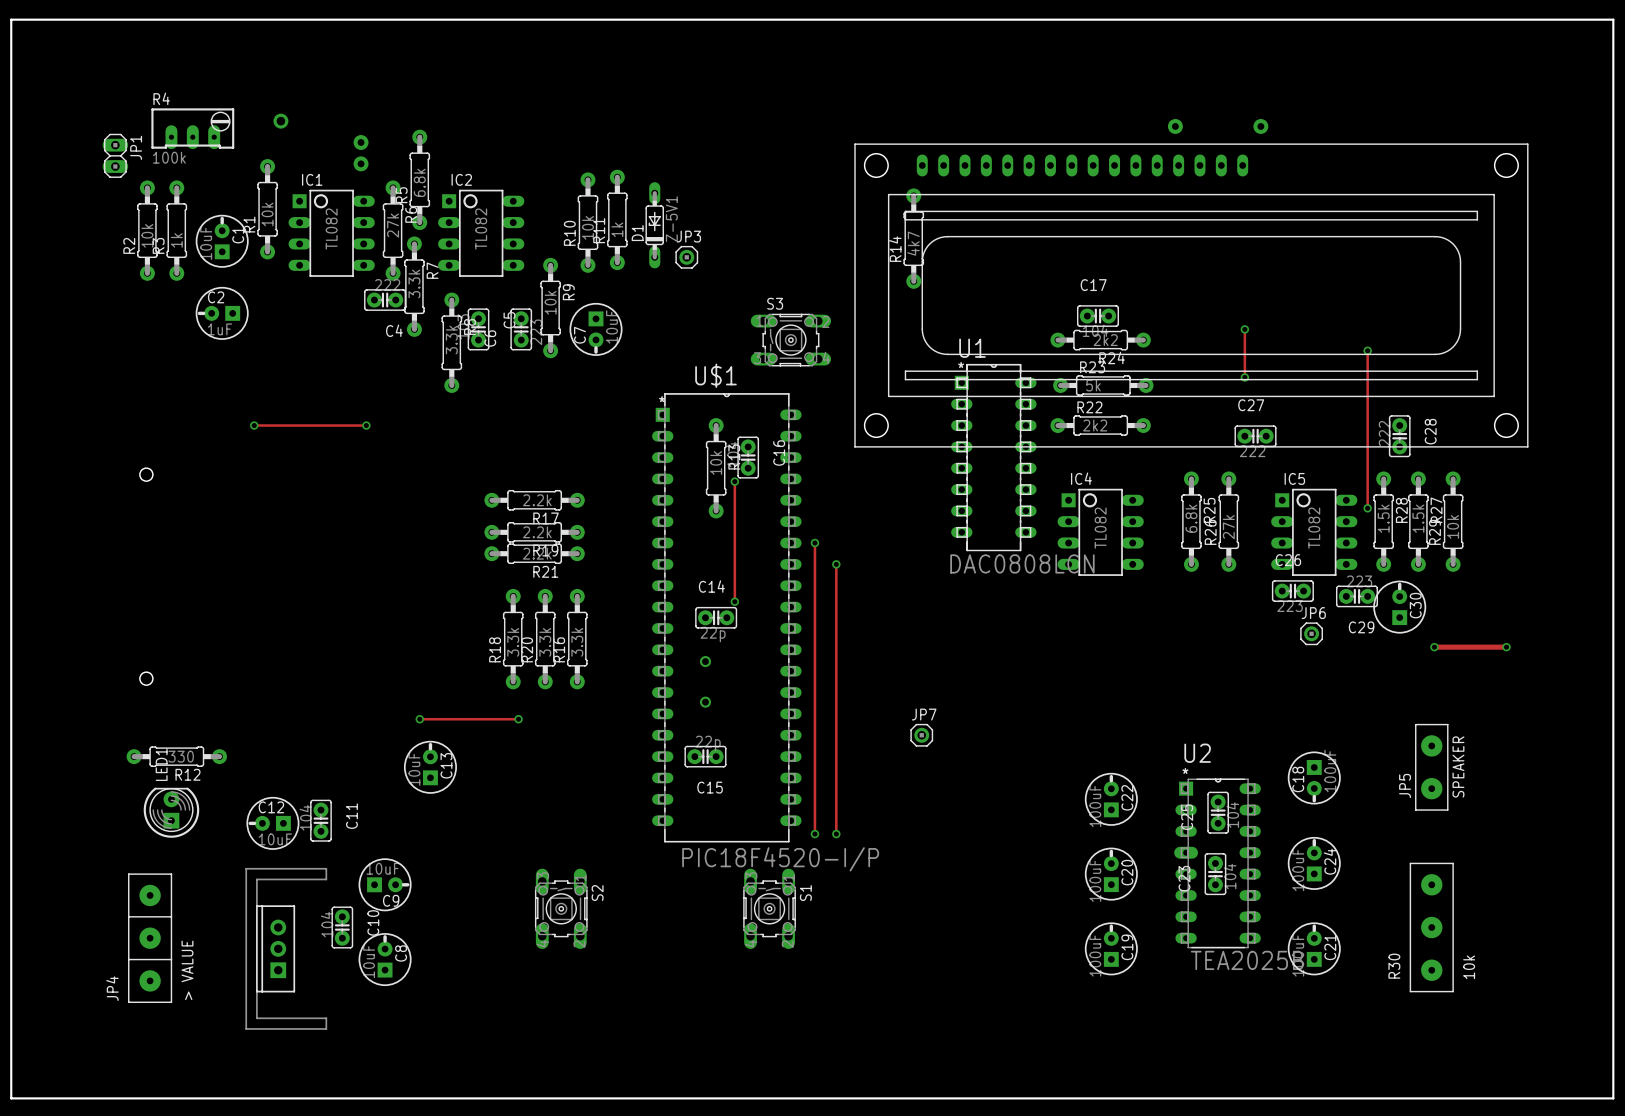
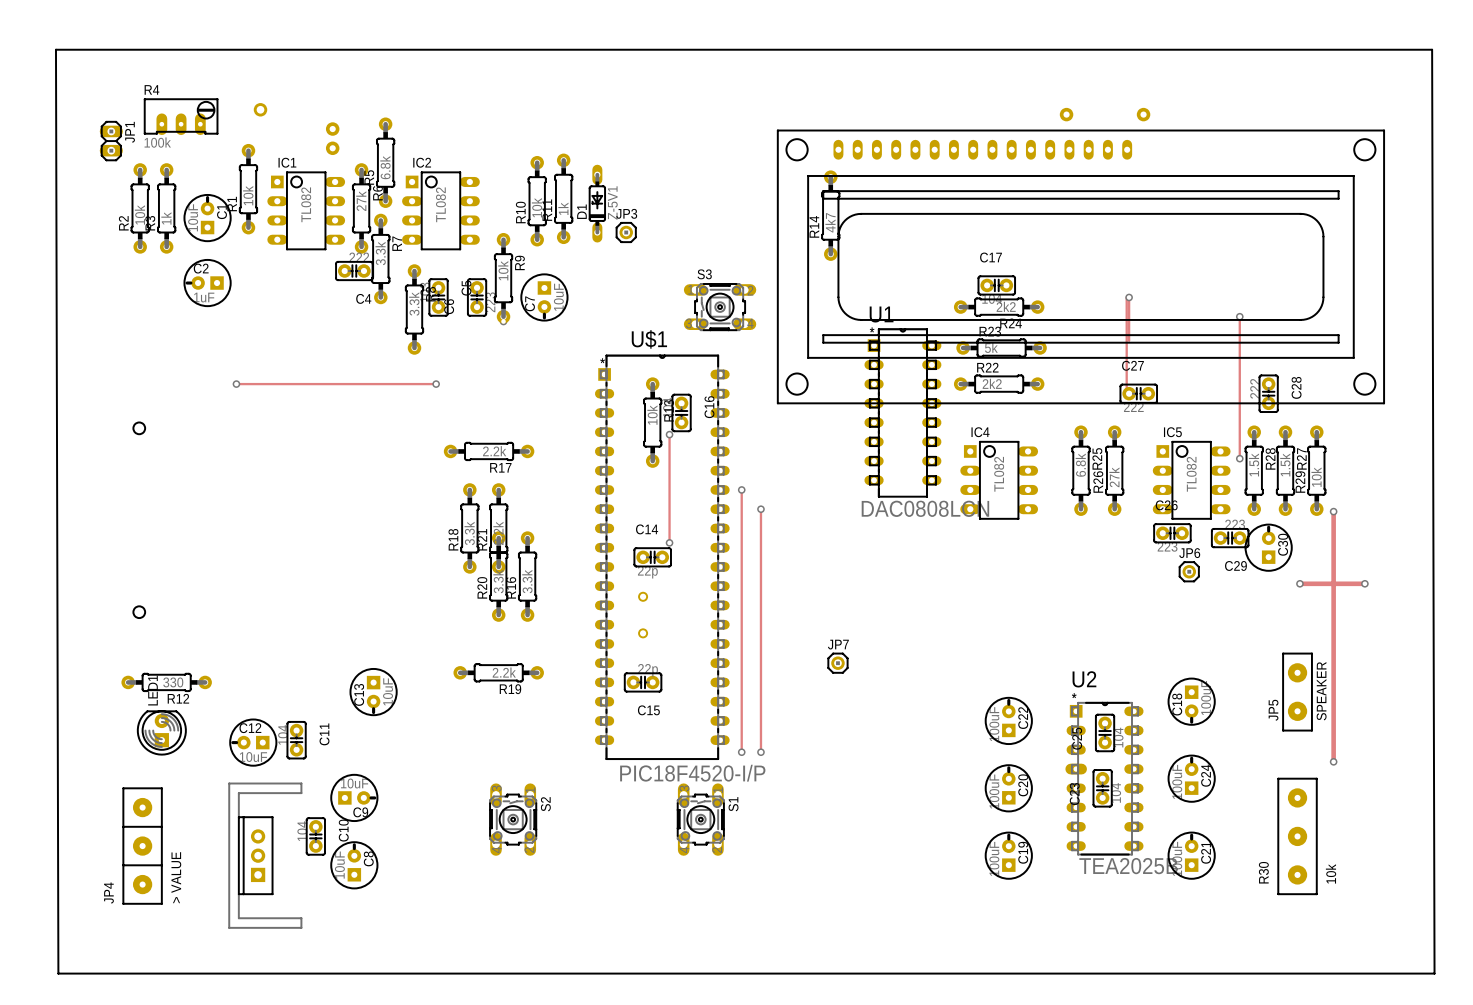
board edge: (11, 19) (1613, 19) (1613, 1098) (11, 1098) (11, 19) -> (55, 49) (58, 973) (1434, 973) (1432, 49) (55, 49)
track: none -> (1126, 297) (1126, 391)
via: none -> (503, 321)
via: (1244, 377) -> none
track: none -> (337, 384) (436, 384)
via: (366, 425) -> none
via: none -> (436, 384)
R19 position: (534, 532) -> (498, 672)
R21 rotation: 0° (534, 553) -> 90° clockwise (498, 528)
track: none -> (1333, 511) (1333, 761)
via: none -> (1333, 511)
R18 position: (513, 639) -> (469, 528)
track: (419, 719) (518, 719) -> none
via: (419, 719) -> none
via: (518, 719) -> none
C13 rotation: 0° (430, 767) -> 180° (373, 692)
via: none -> (1333, 761)

